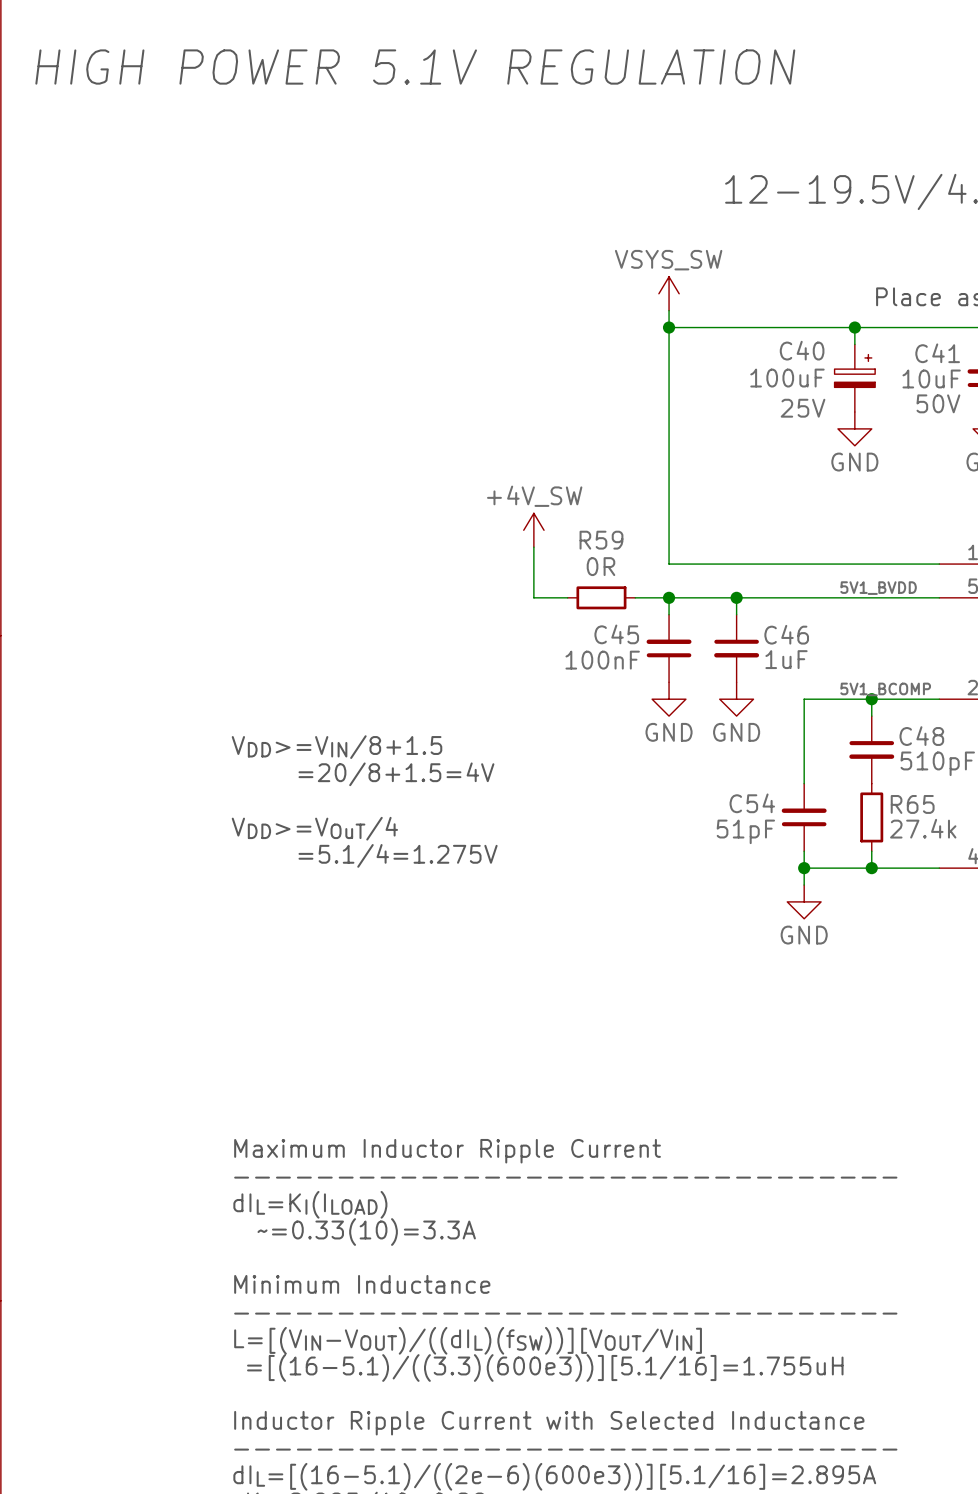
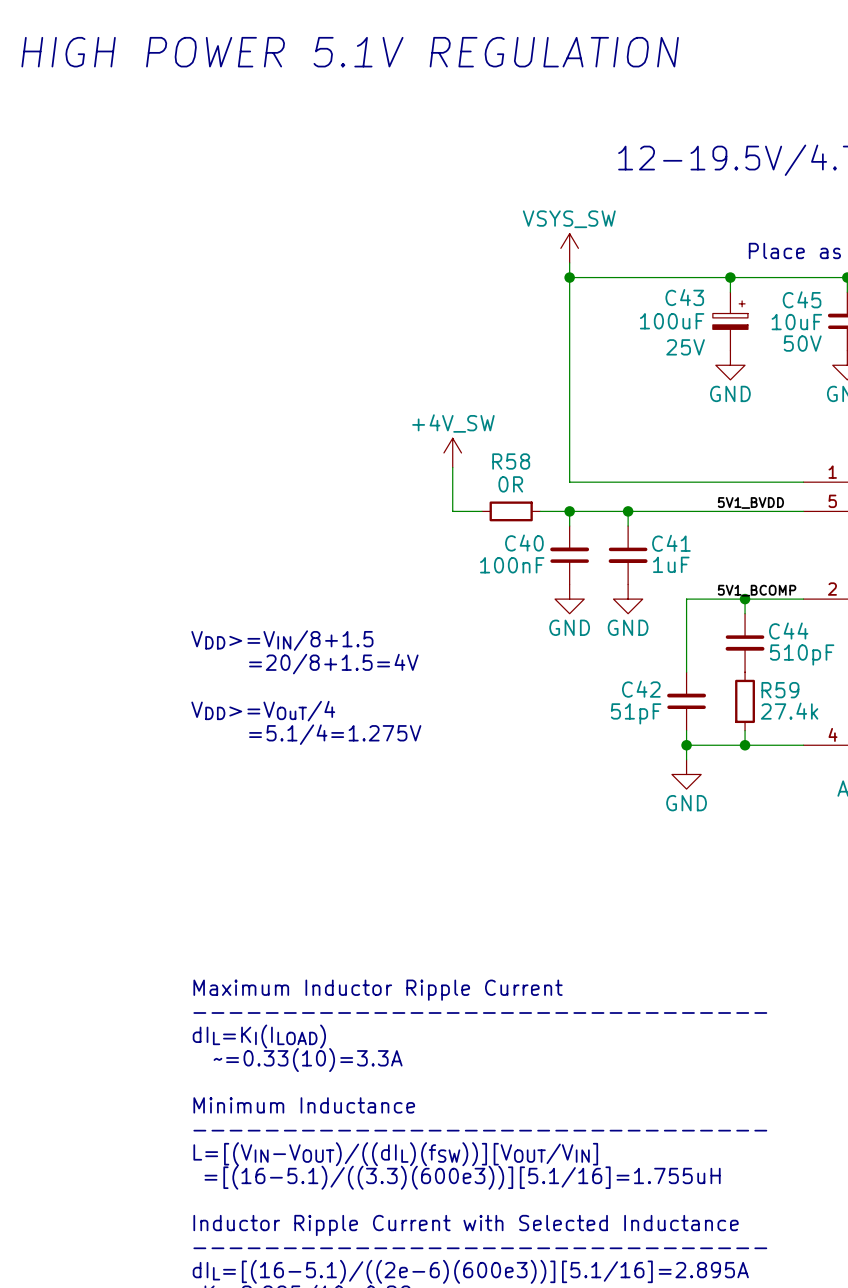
C40 name: C40 (802, 350) -> C43 (684, 297)
C41 name: C41 (937, 353) -> C45 (802, 299)
R59 name: R59 (601, 540) -> R58 (511, 461)
C45 name: C45 (616, 634) -> C40 (524, 543)
C46 name: C46 (786, 634) -> C41 (671, 543)
C48 name: C48 (921, 736) -> C44 (788, 631)
C54 name: C54 (752, 803) -> C42 (641, 689)
R65 name: R65 (912, 804) -> R59 (780, 690)

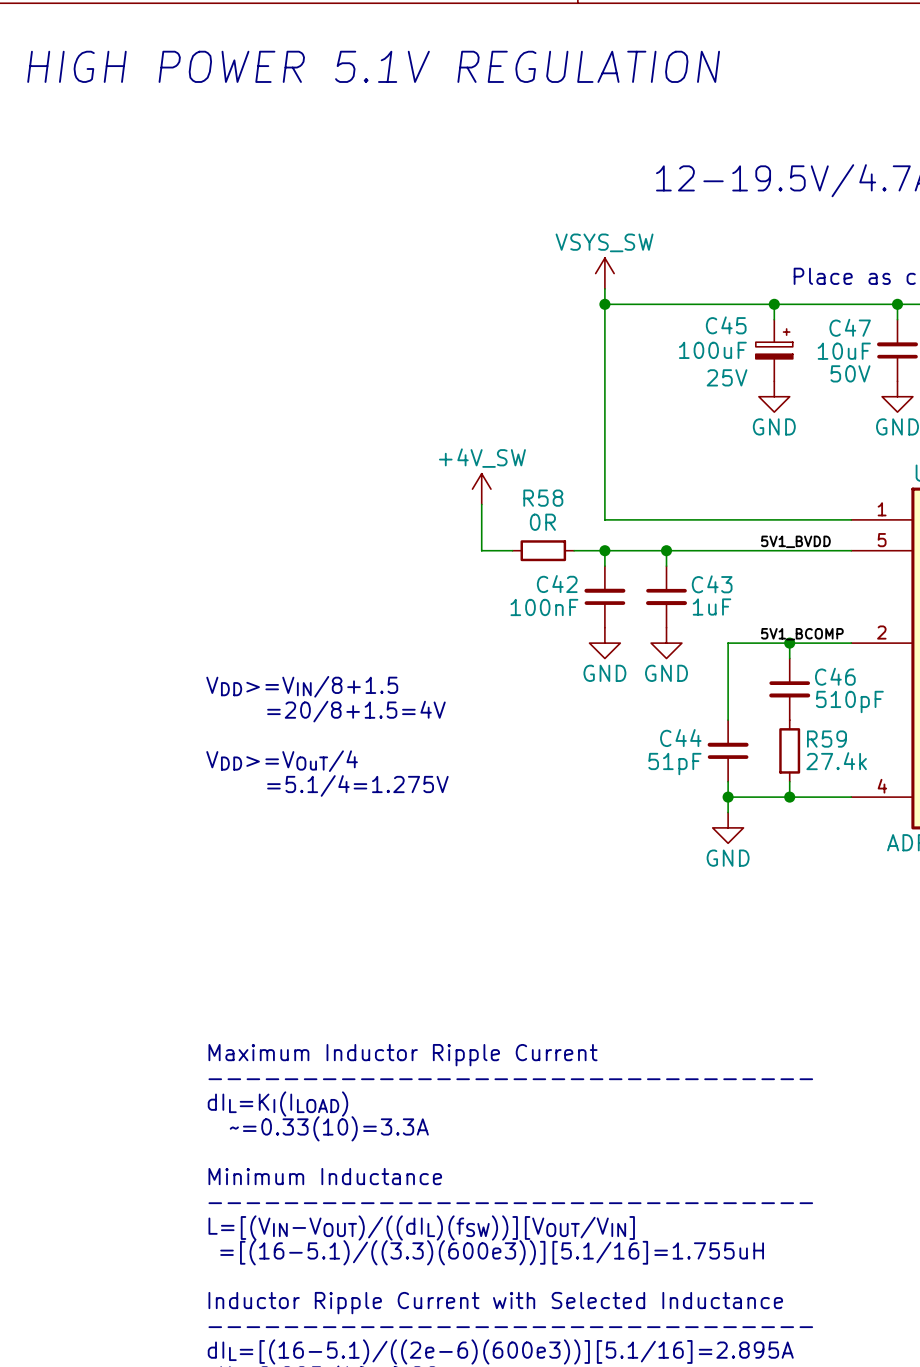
C43 name: C43 (684, 297) -> C45 (726, 325)
C45 name: C45 (802, 299) -> C47 (850, 327)
C40 name: C40 (524, 543) -> C42 (557, 584)
C41 name: C41 (671, 543) -> C43 (712, 584)
C44 name: C44 (788, 631) -> C46 (835, 676)
C42 name: C42 (641, 689) -> C44 (680, 738)

